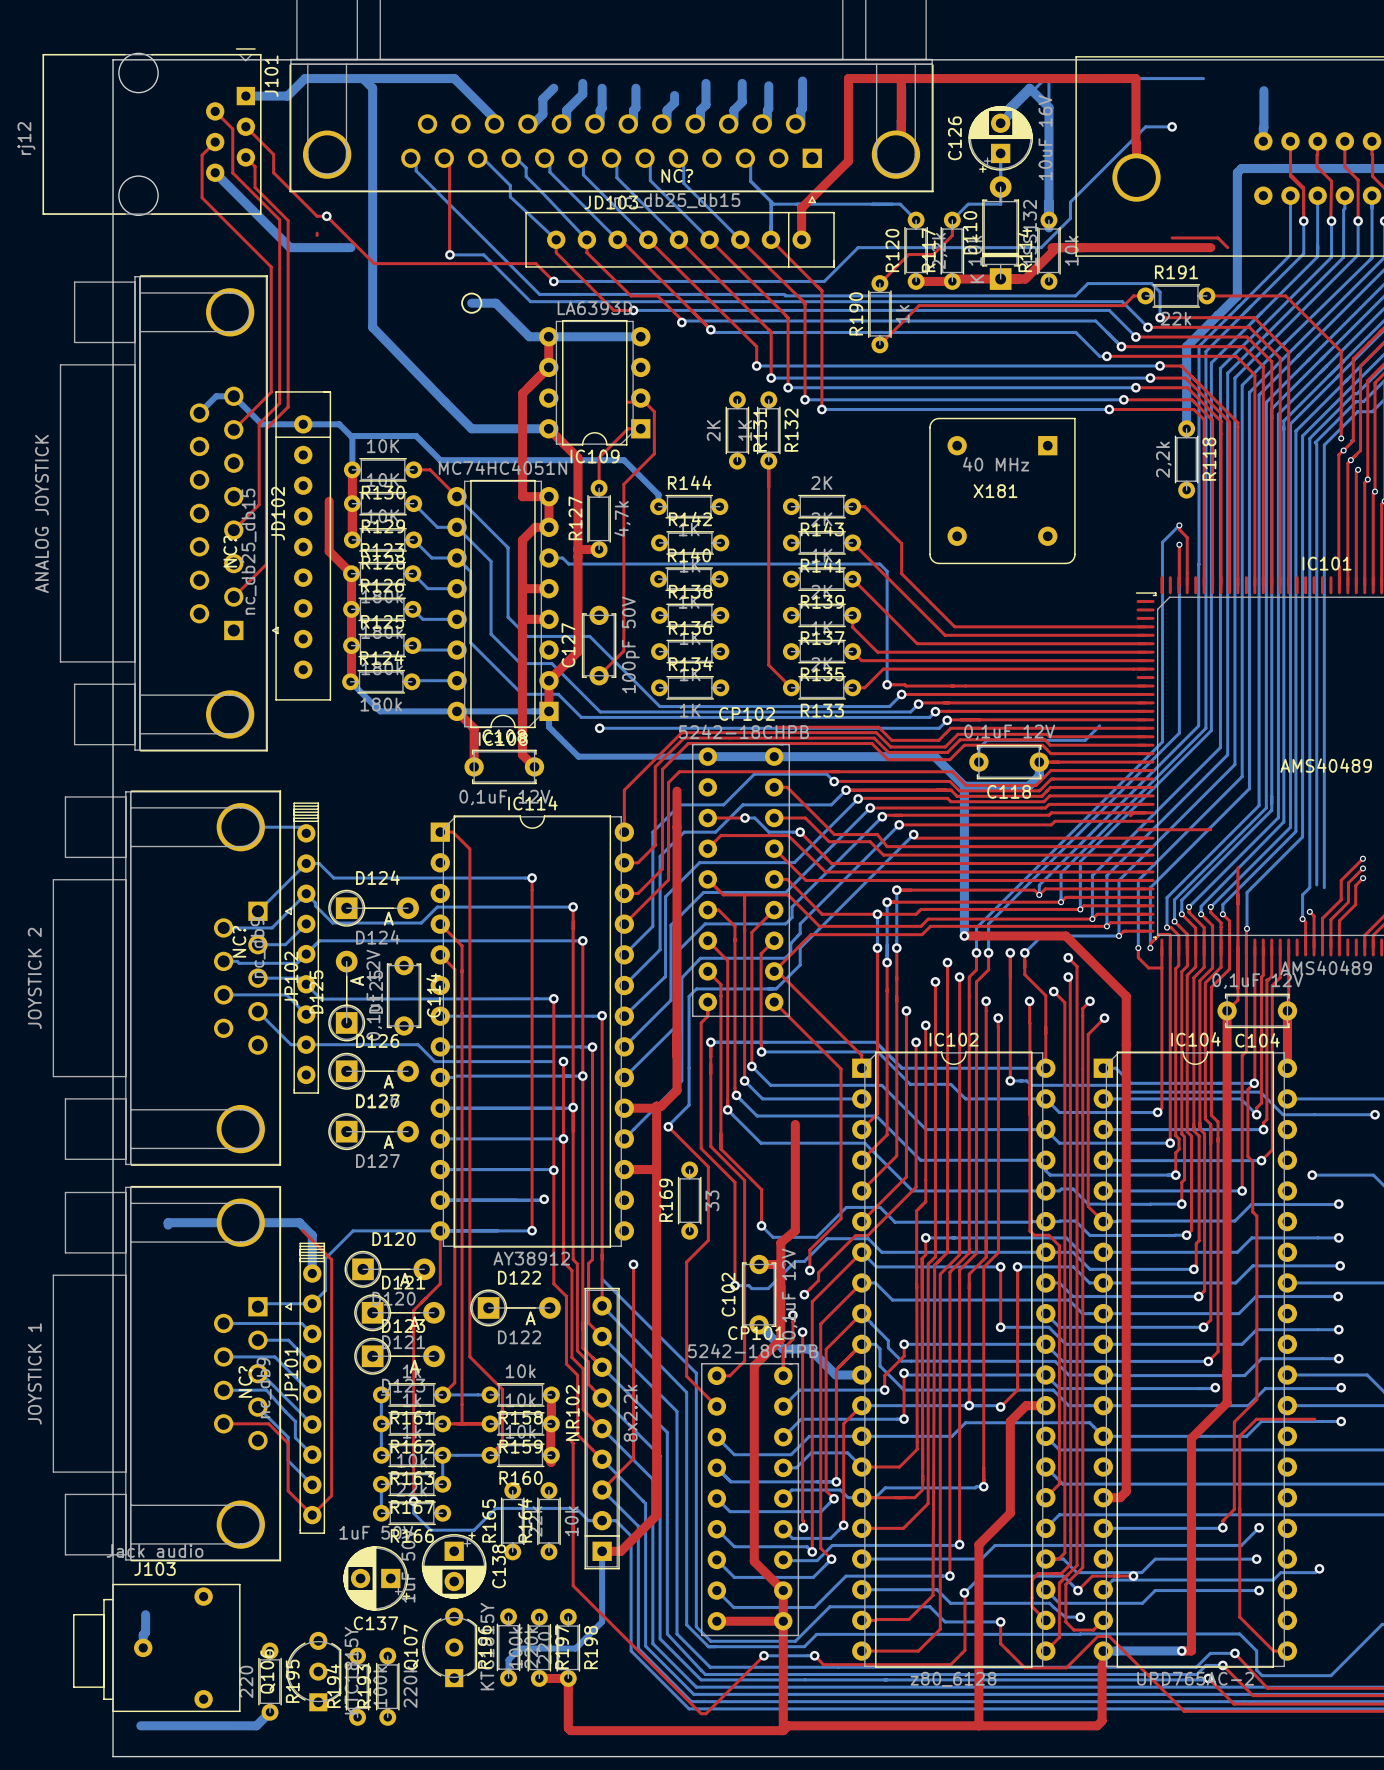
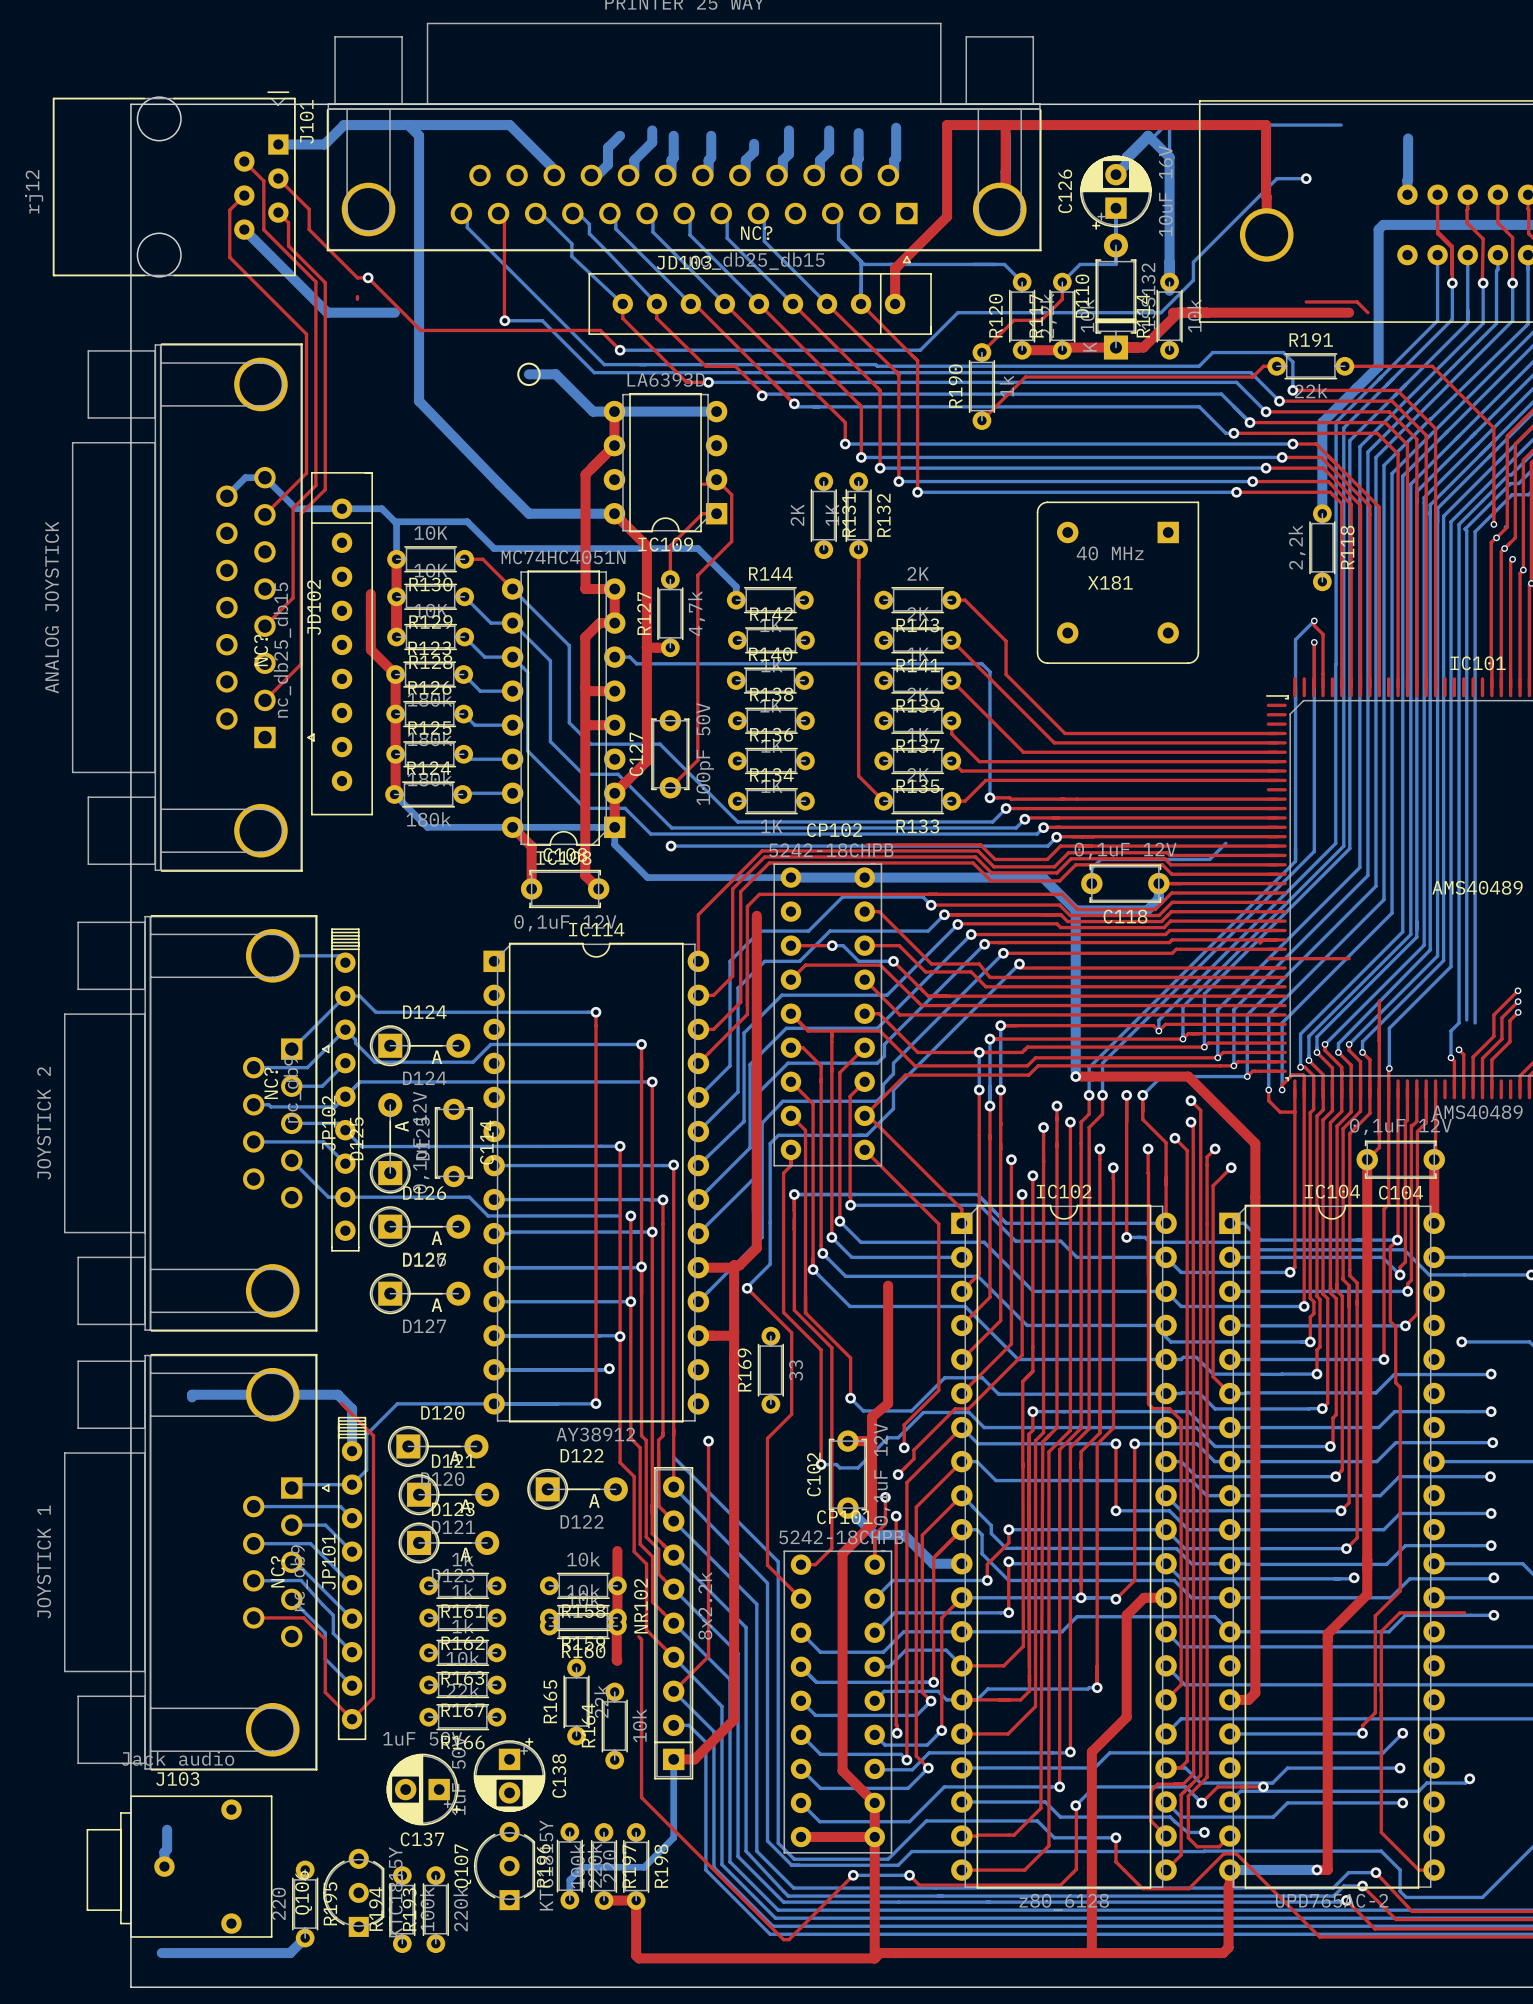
top track: (440, 832) (452, 832) (469, 849) (469, 1356) (502, 1389) (502, 1442) (490, 1455) -> none
top track: (440, 924) (462, 945) (462, 1423) -> none
top track: (440, 954) (454, 969) (454, 1382) (442, 1394) -> none
top track: (440, 1230) (440, 1283) (413, 1310) (413, 1501) -> none
top track: none -> (617, 1551) (617, 1585)
bottom track: (381, 1394) (381, 1455) -> none
bottom track: (442, 1394) (490, 1394) -> none
top track: (442, 1423) (490, 1423) -> none
bottom track: (490, 1455) (442, 1455) (442, 1484) -> none
R160 position: (520, 1455) -> (583, 1626)
bottom track: (381, 1484) (381, 1513) -> none
bottom track: (413, 1501) (413, 1513) (430, 1530) (474, 1530) (495, 1508) (576, 1508) (588, 1520) (602, 1520) -> none
via: (413, 1501) -> none
R165 position: (512, 1521) -> (576, 1701)

